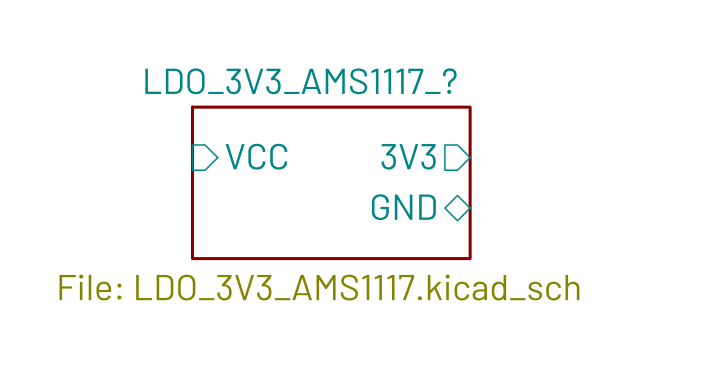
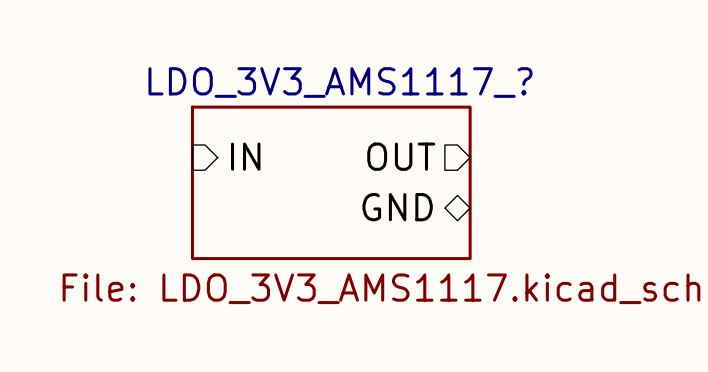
sheet pin: VCC (256, 156) -> IN (245, 156)
sheet pin: 3V3 (408, 156) -> OUT (401, 156)

